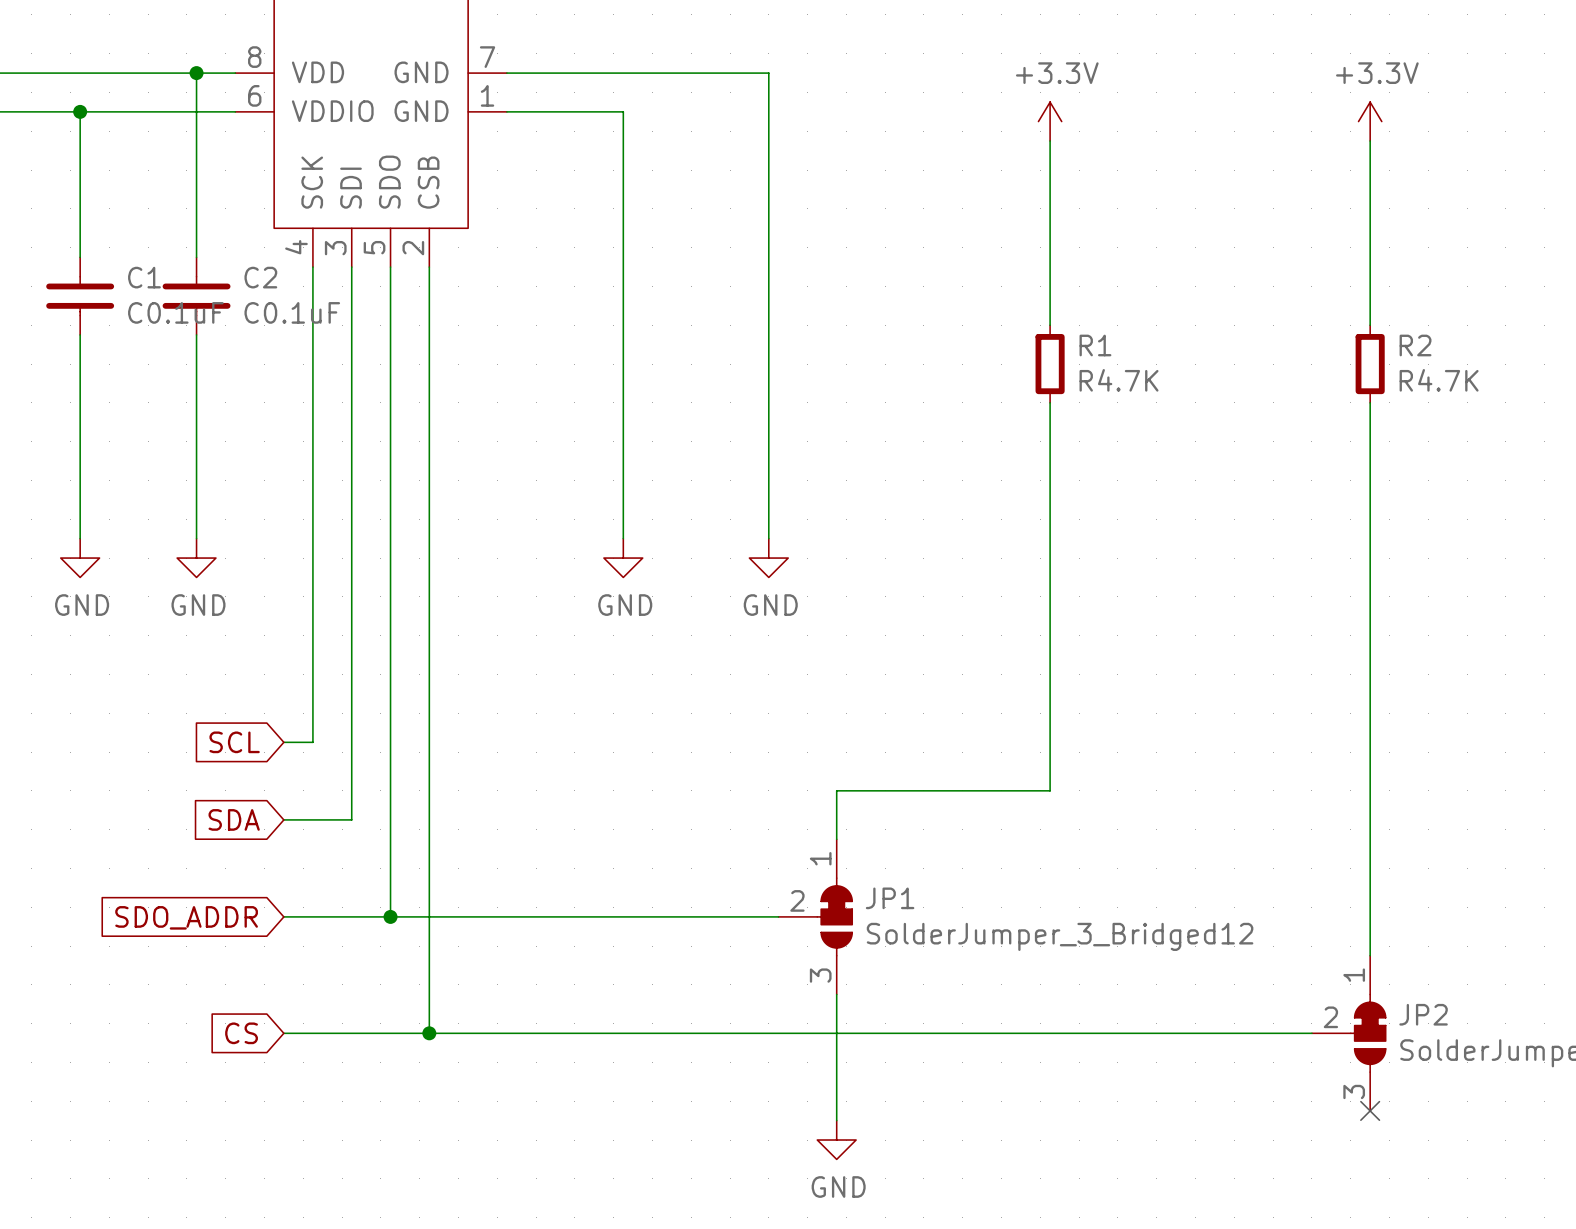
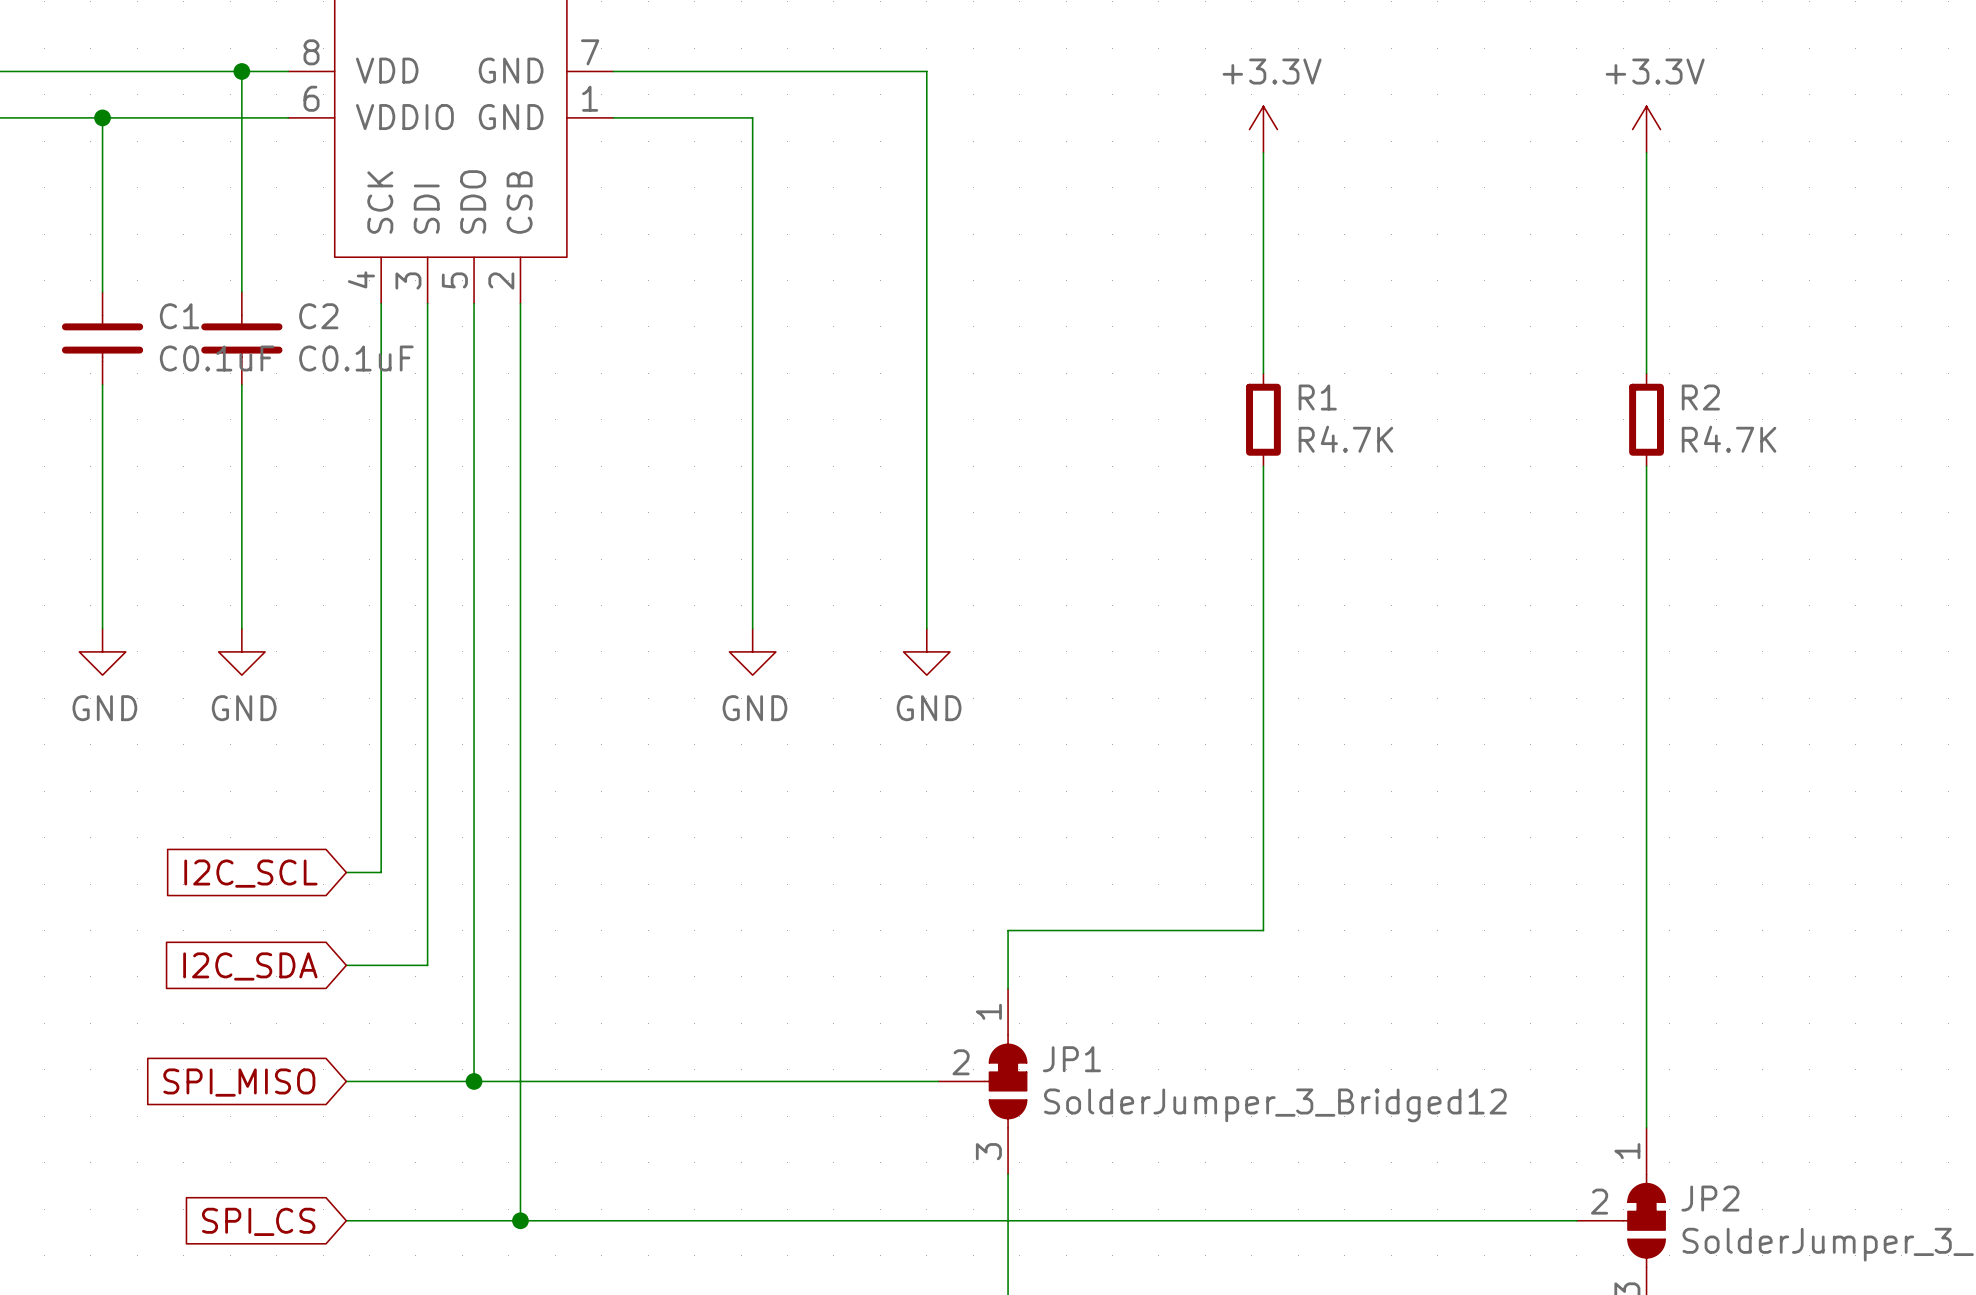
global label: SCL (234, 742) -> I2C_SCL (250, 873)
global label: SDA (234, 819) -> I2C_SDA (250, 966)
global label: SDO_ADDR (186, 917) -> SPI_MISO (239, 1082)
global label: CS (241, 1033) -> SPI_CS (258, 1221)

